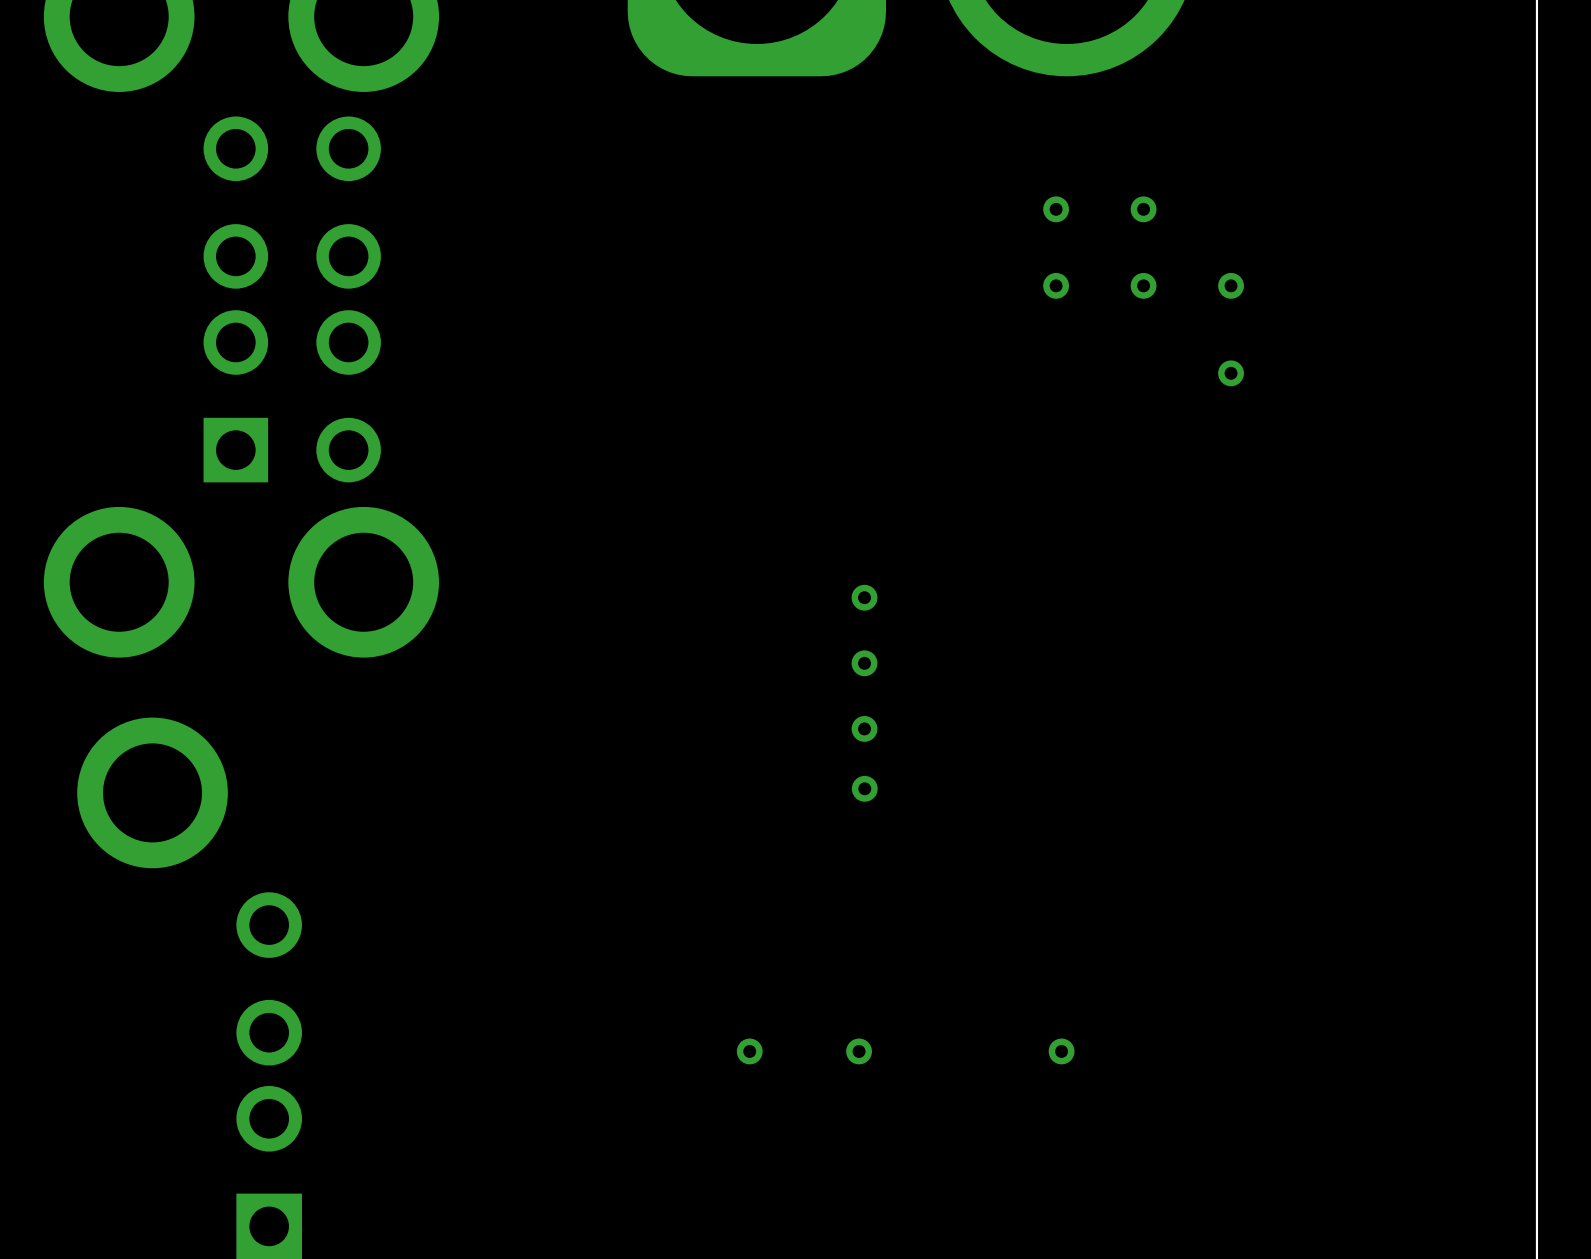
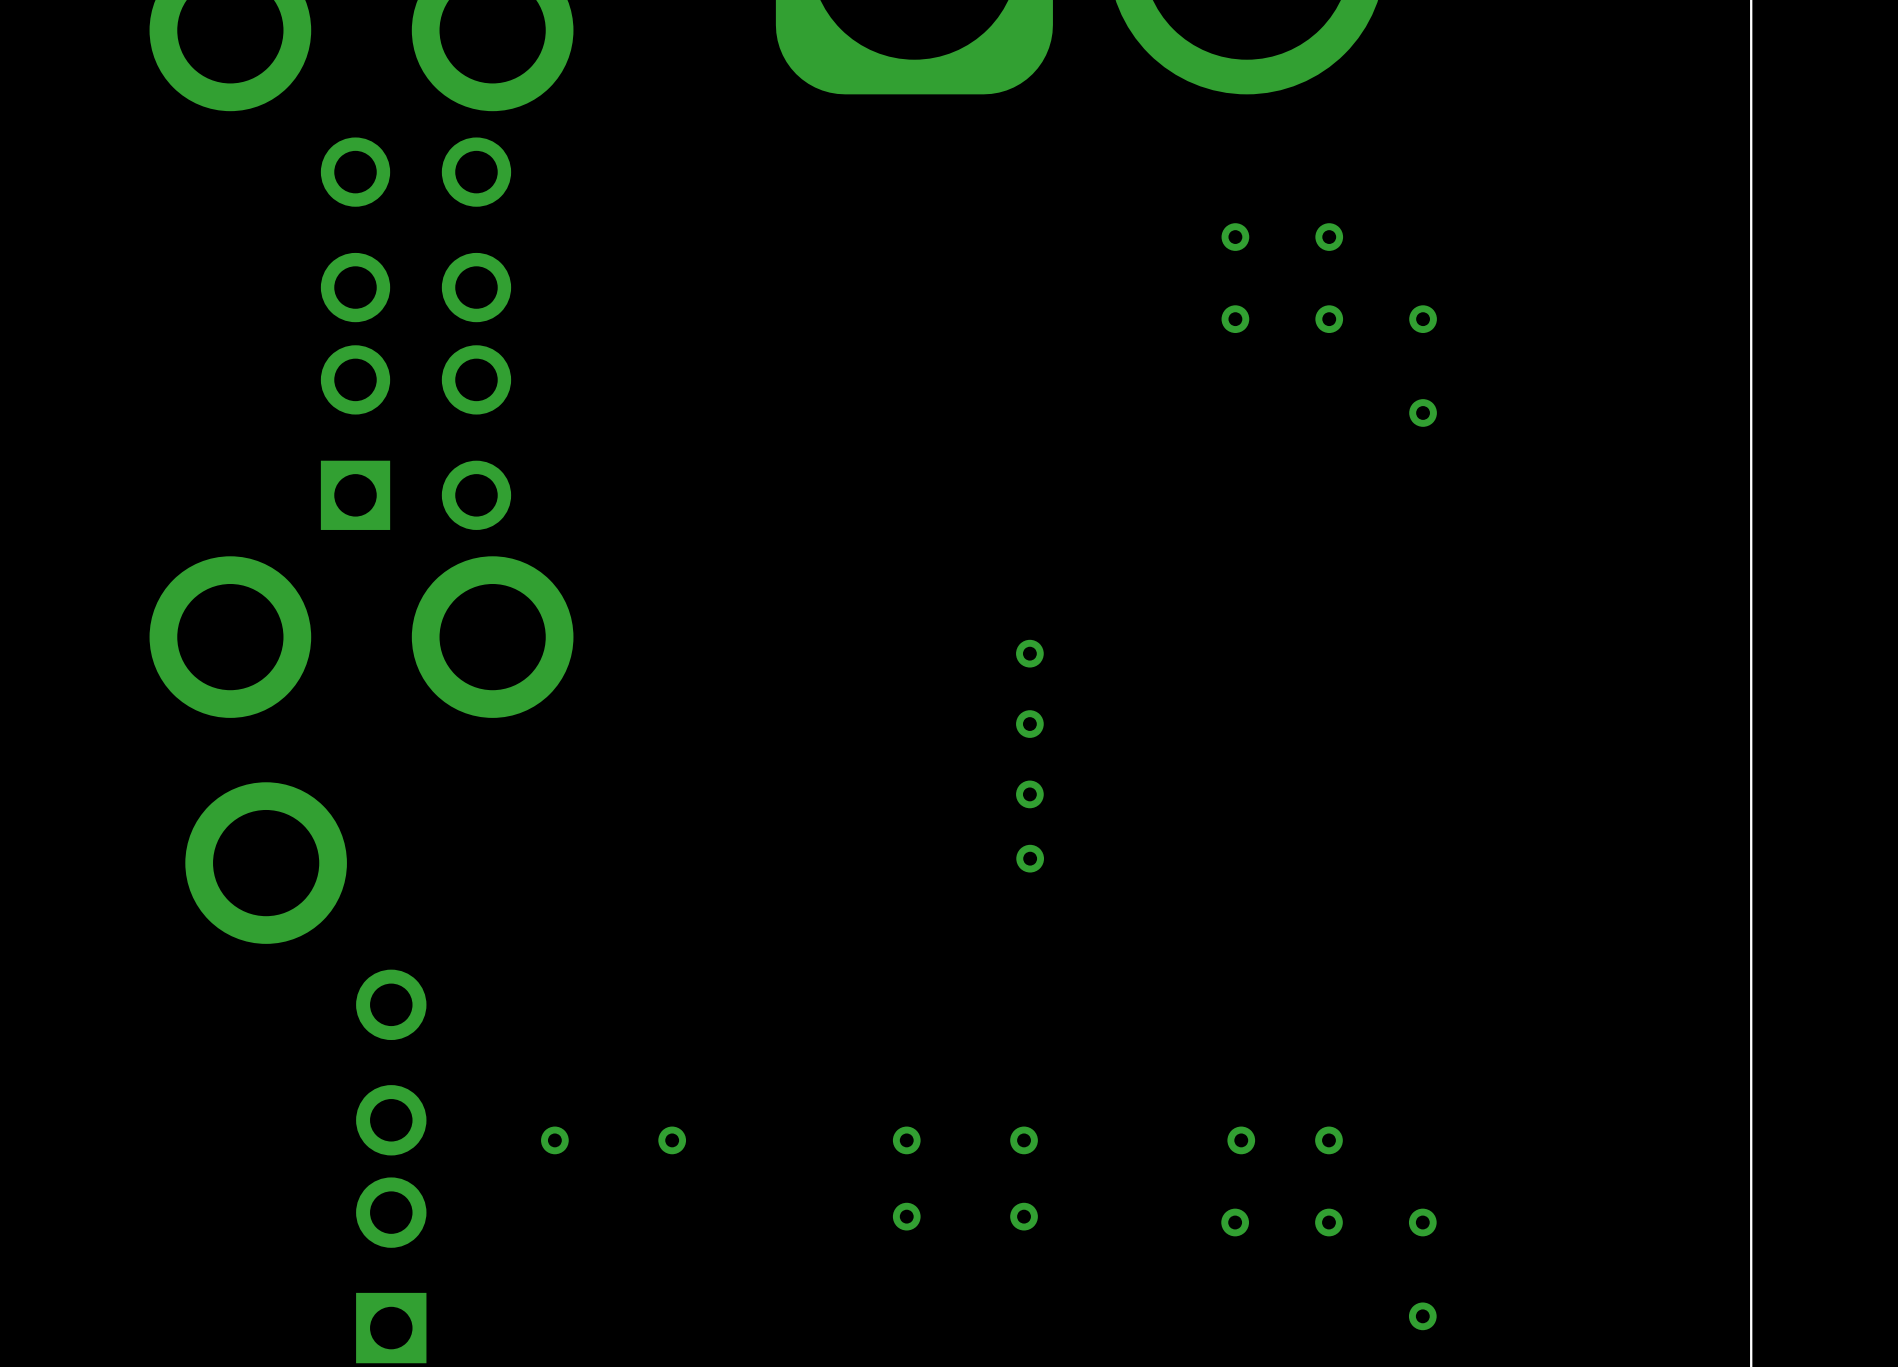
via: none -> (554, 1140)
via: none -> (672, 1140)
via: none -> (1328, 1140)
via: none -> (906, 1216)
via: none -> (1024, 1216)
via: none -> (1235, 1222)
via: none -> (1328, 1222)
via: none -> (1422, 1222)
via: none -> (1422, 1316)

